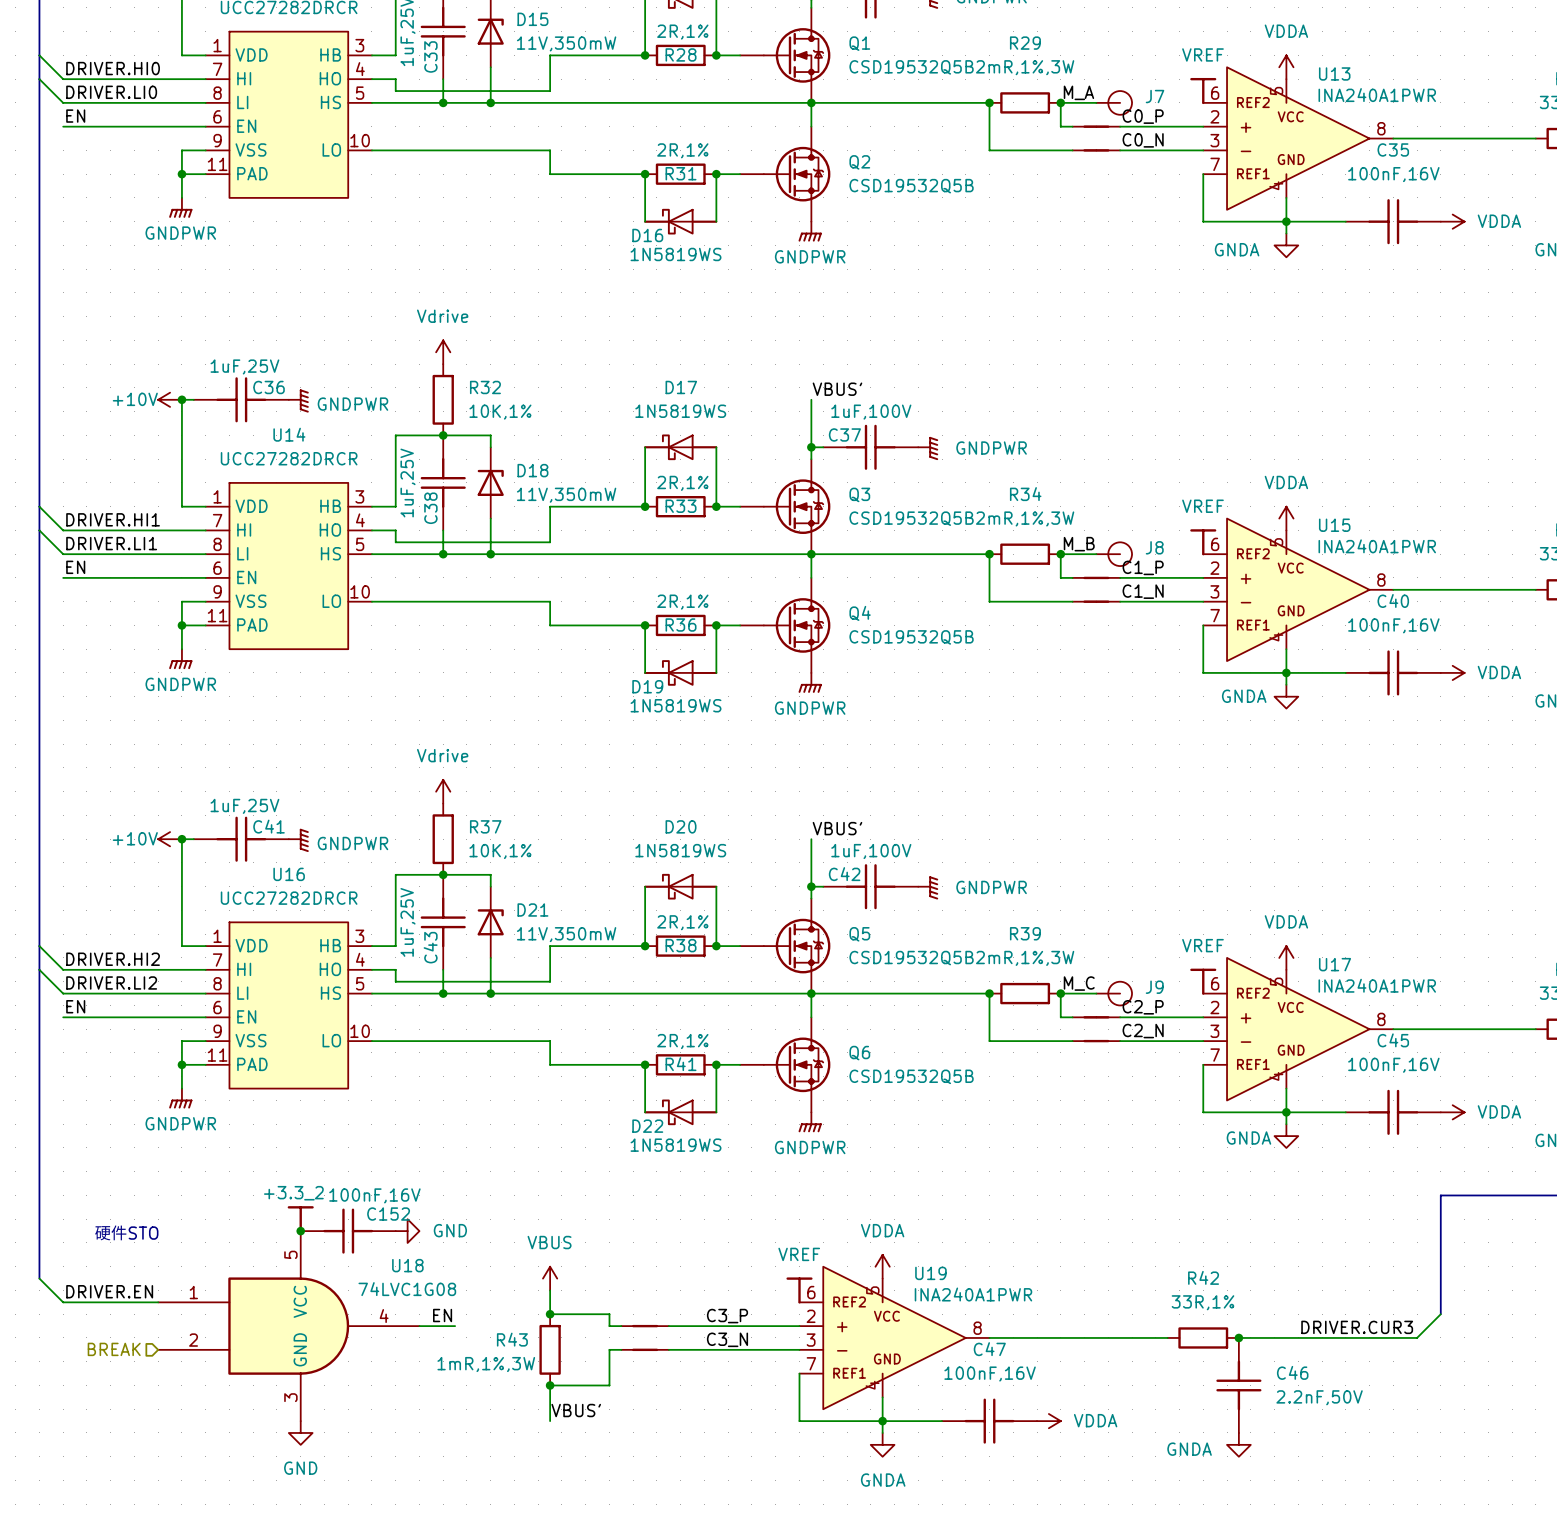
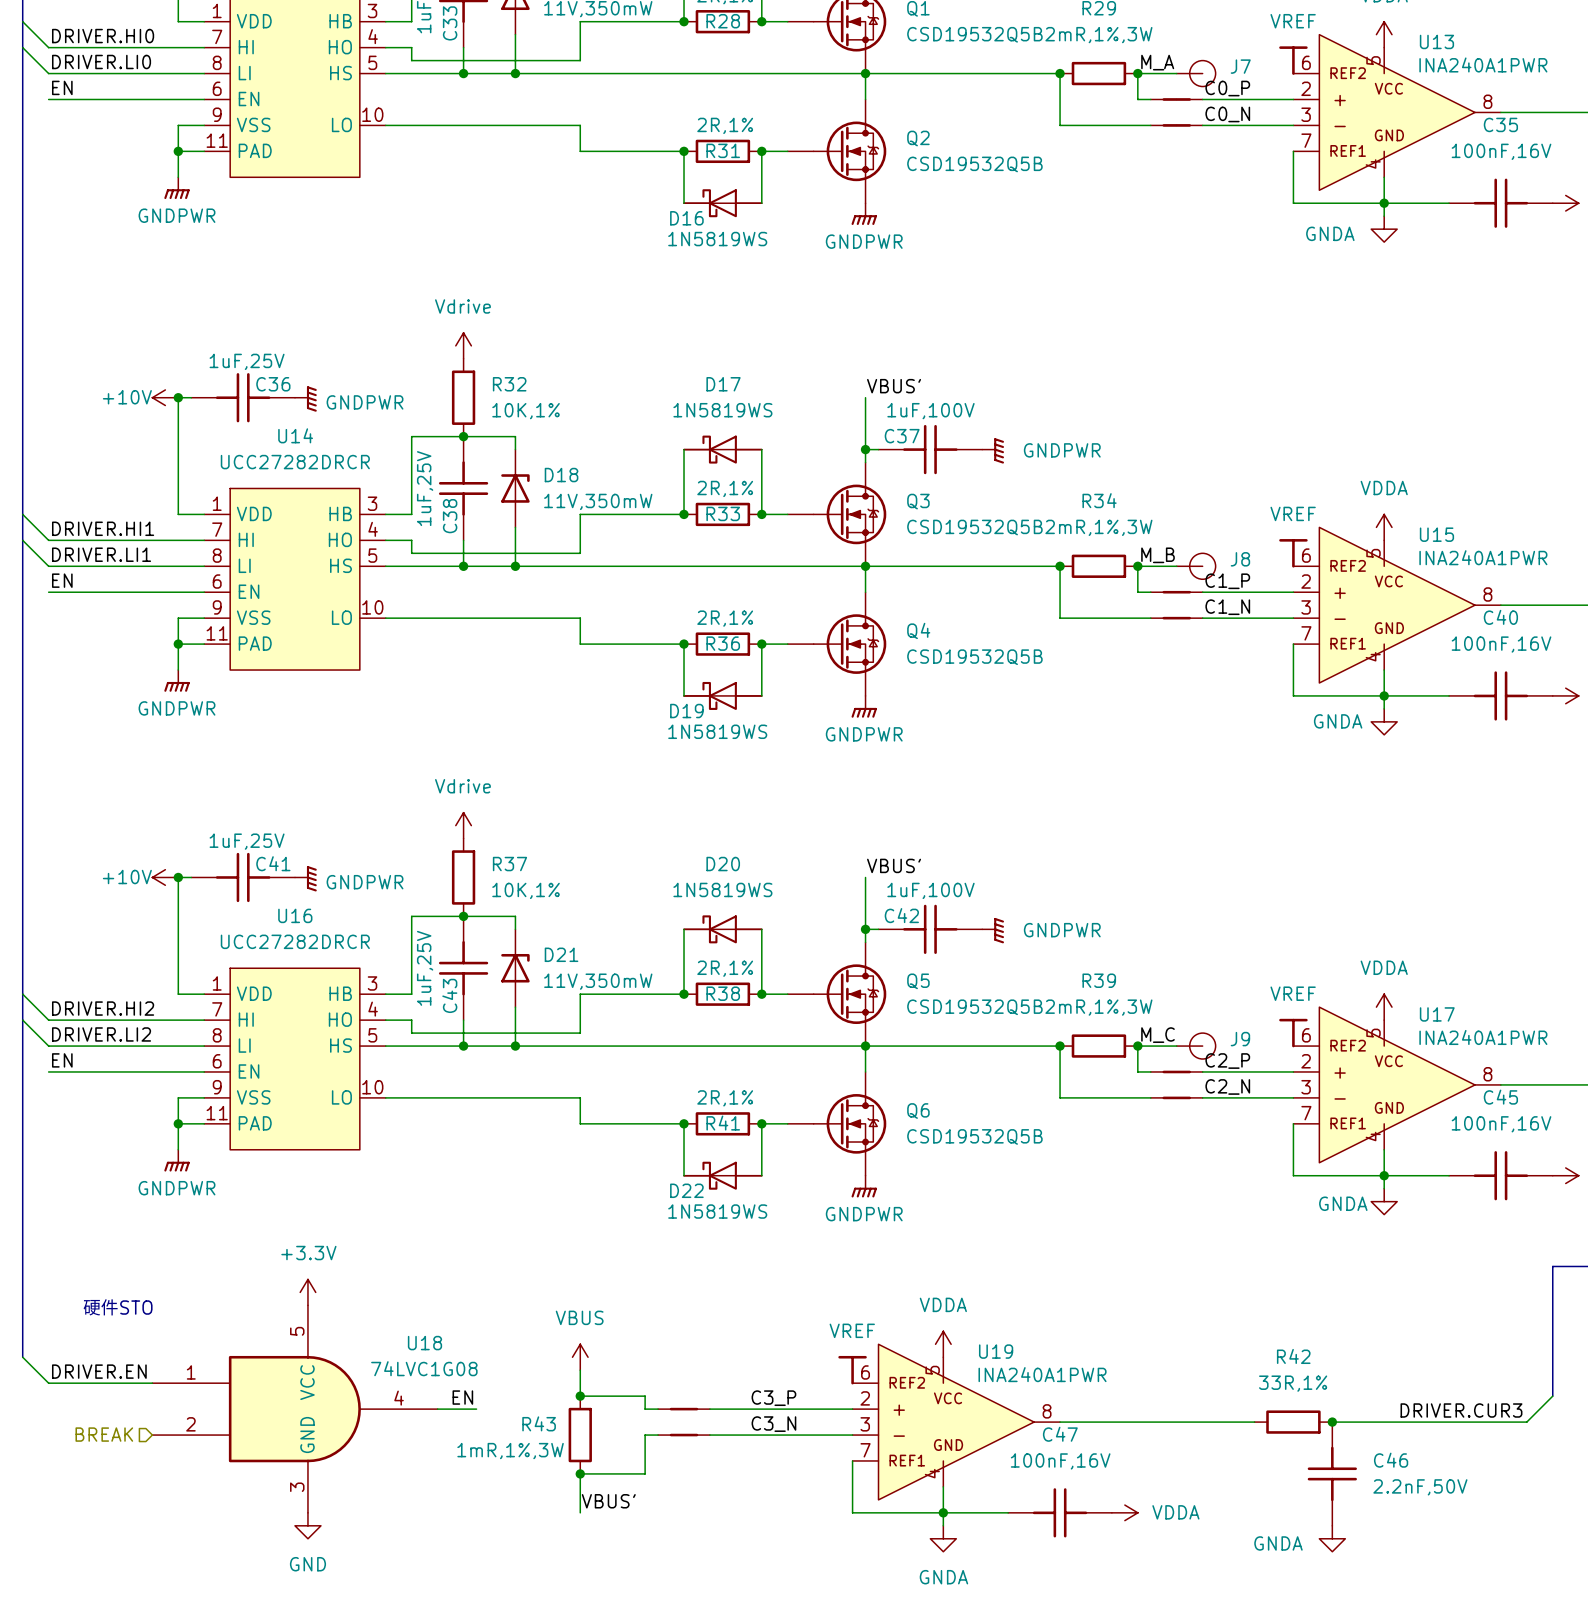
power symbol: +3.3_2 (300, 1219) -> +3.3V (307, 1292)
junction: (300, 1231) -> none
C152: 100nF,16V (348, 1231) -> none
power symbol: GND (407, 1231) -> none

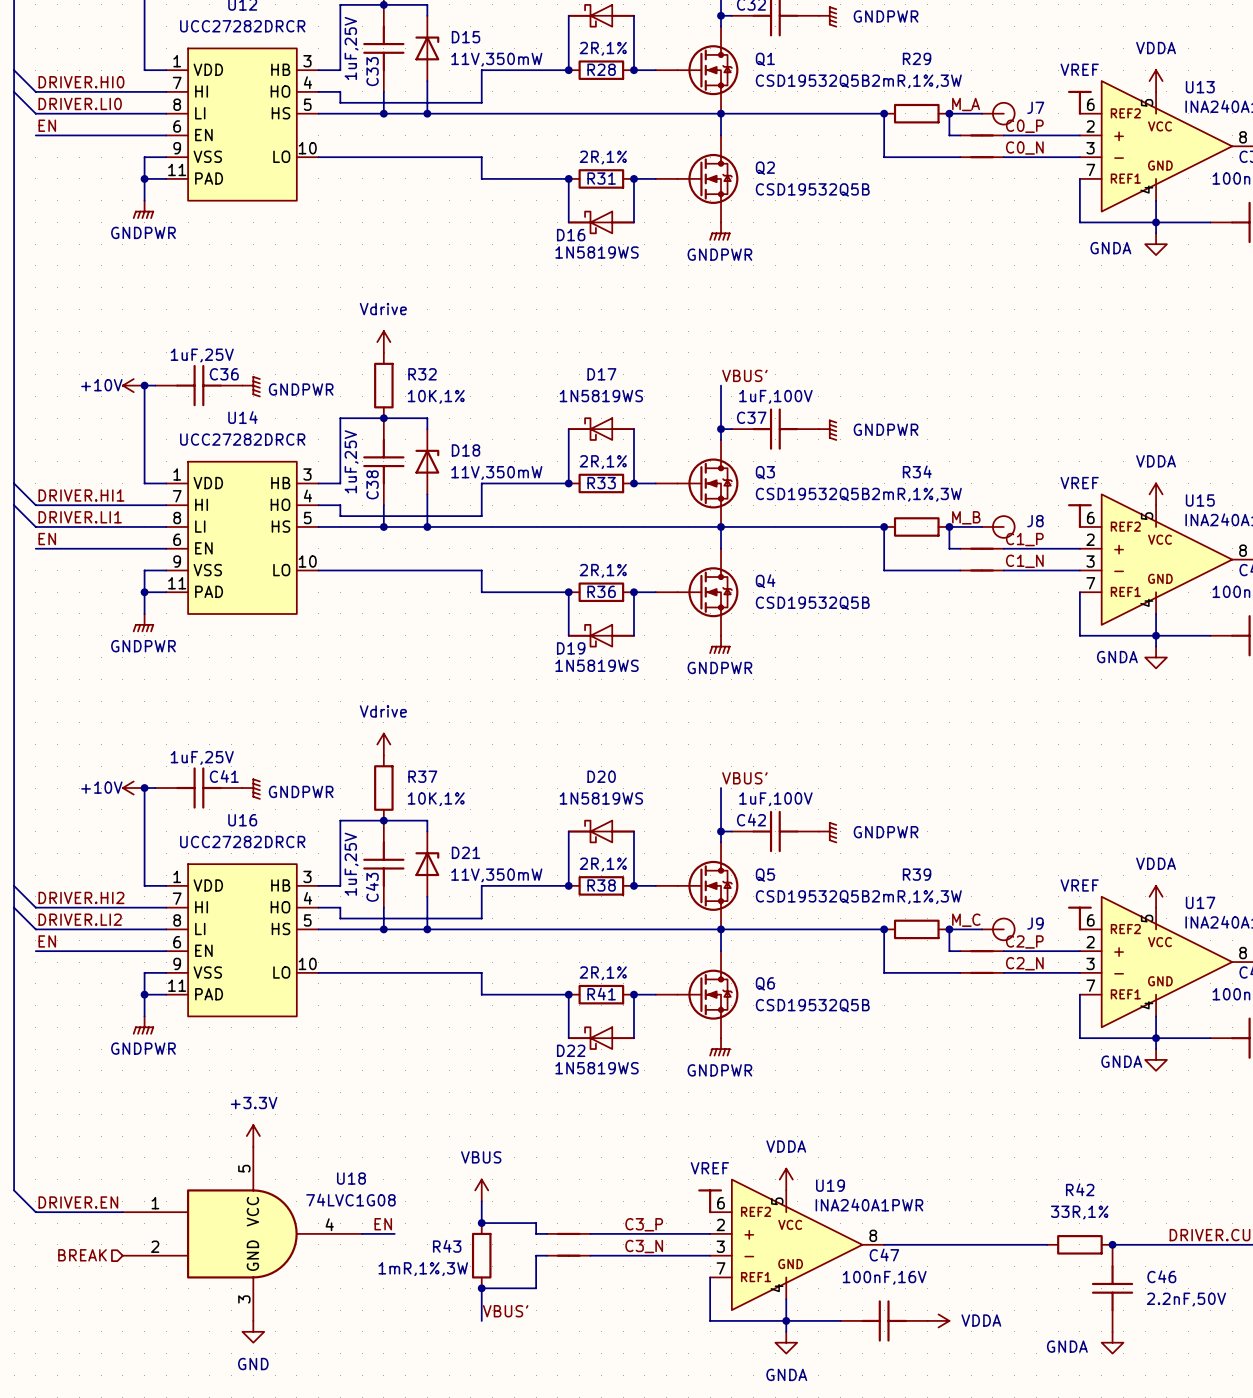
text: 硬件STO (117, 1307) -> none

